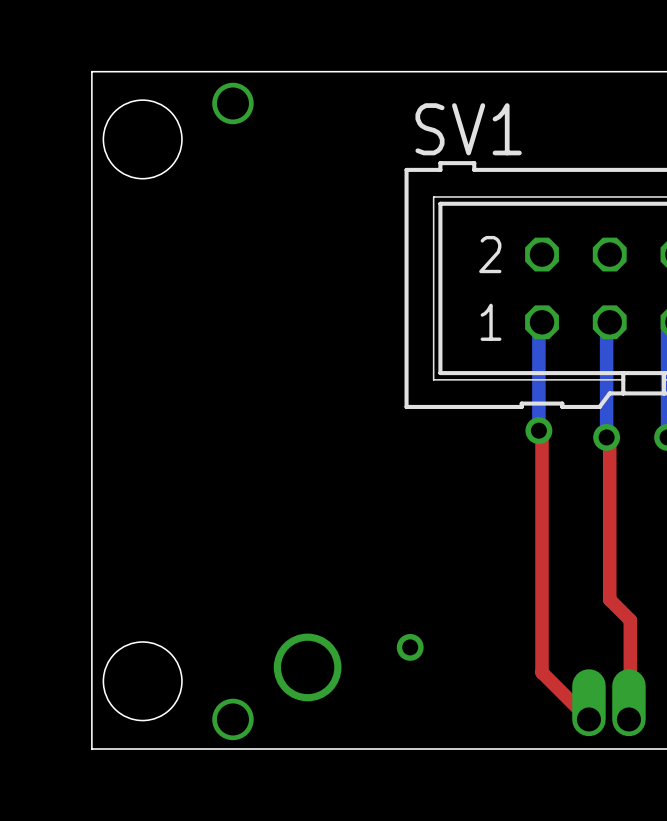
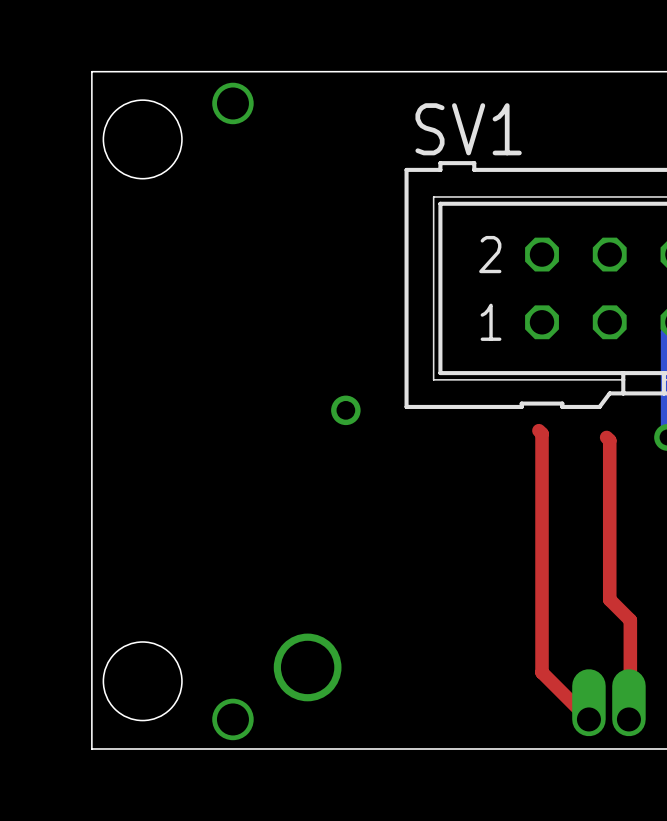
bottom track: (542, 322) (538, 325) (538, 430) -> none
bottom track: (609, 322) (606, 325) (606, 437) -> none
via: none -> (345, 410)
via: (538, 430) -> none
via: (606, 437) -> none
via: (410, 647) -> none

